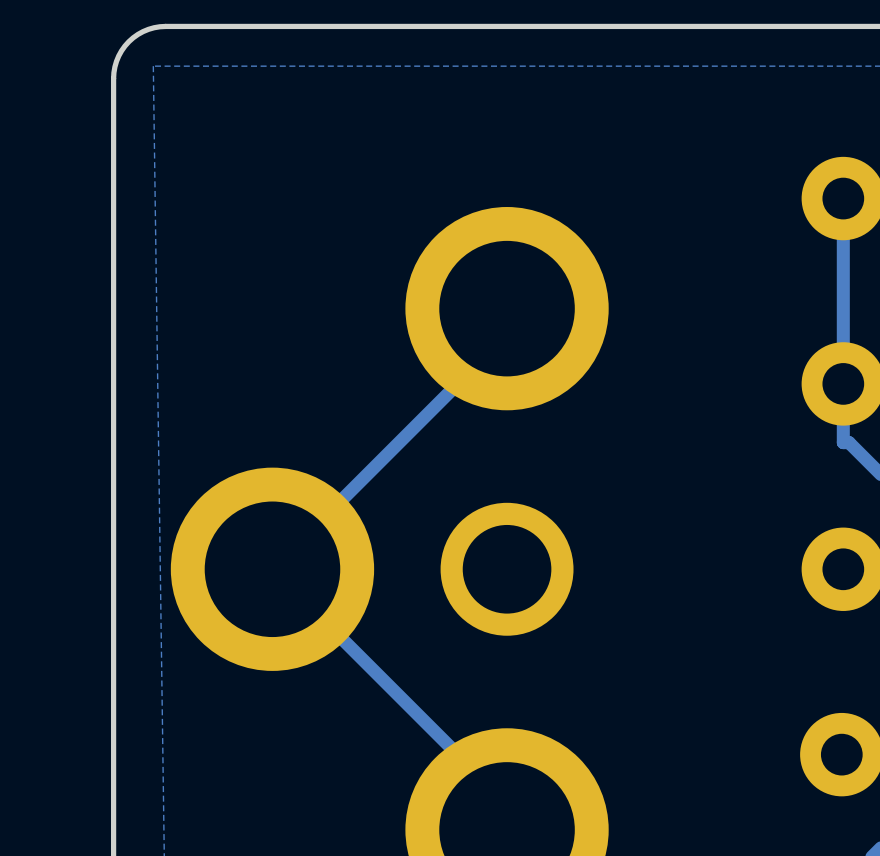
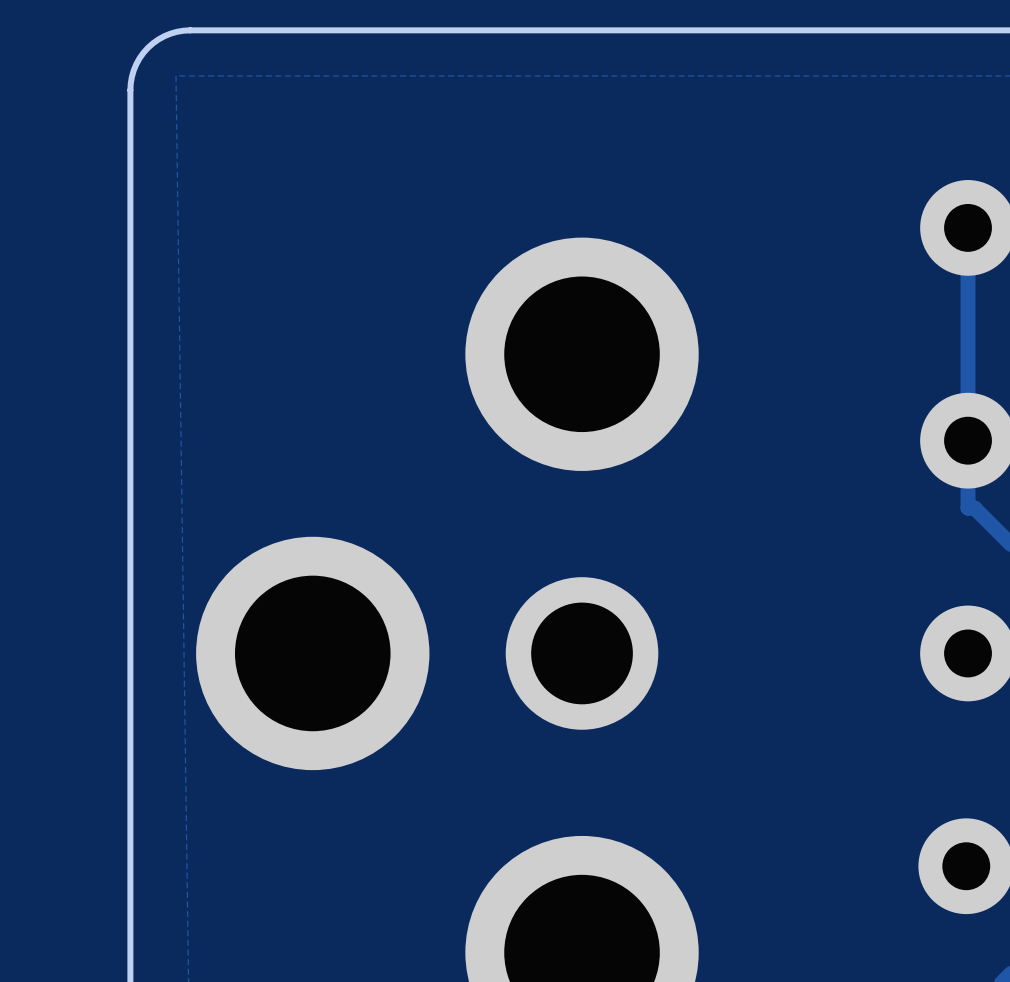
track: (507, 308) (507, 334) (272, 569) (507, 803) (507, 829) -> none

